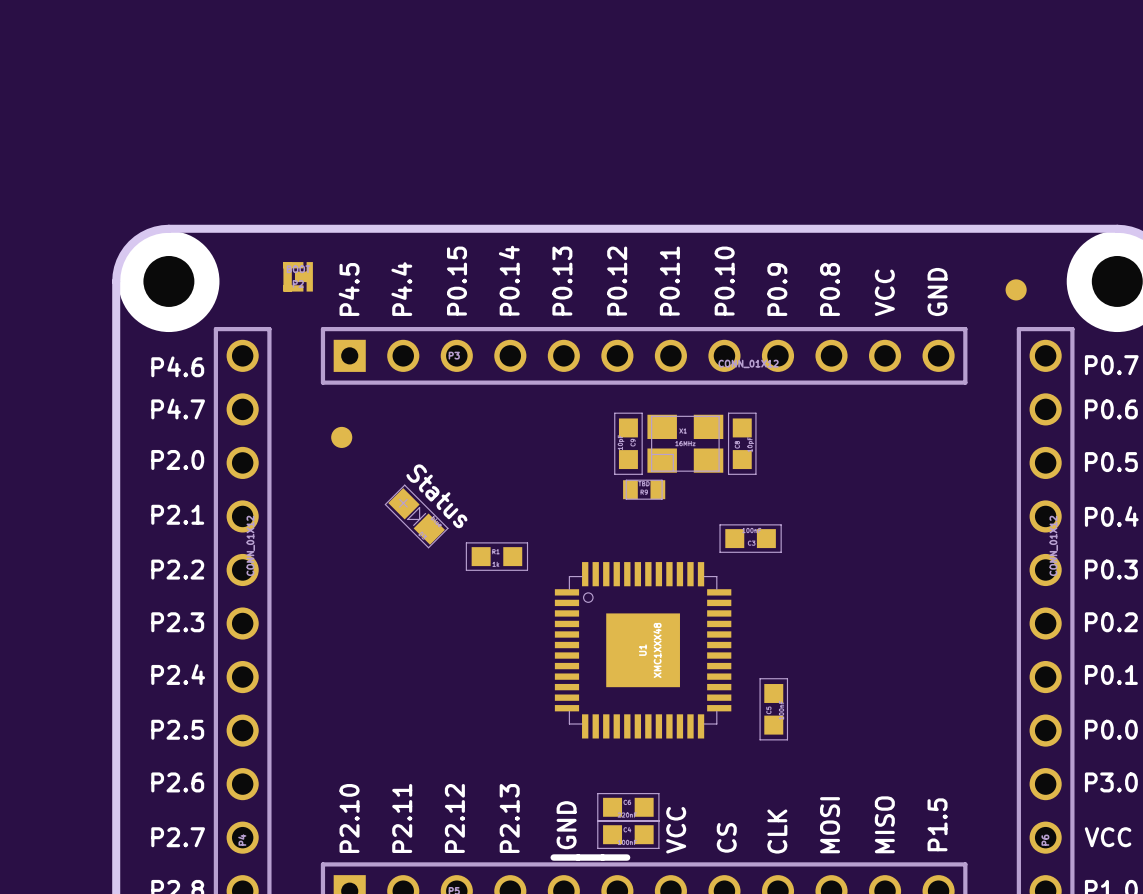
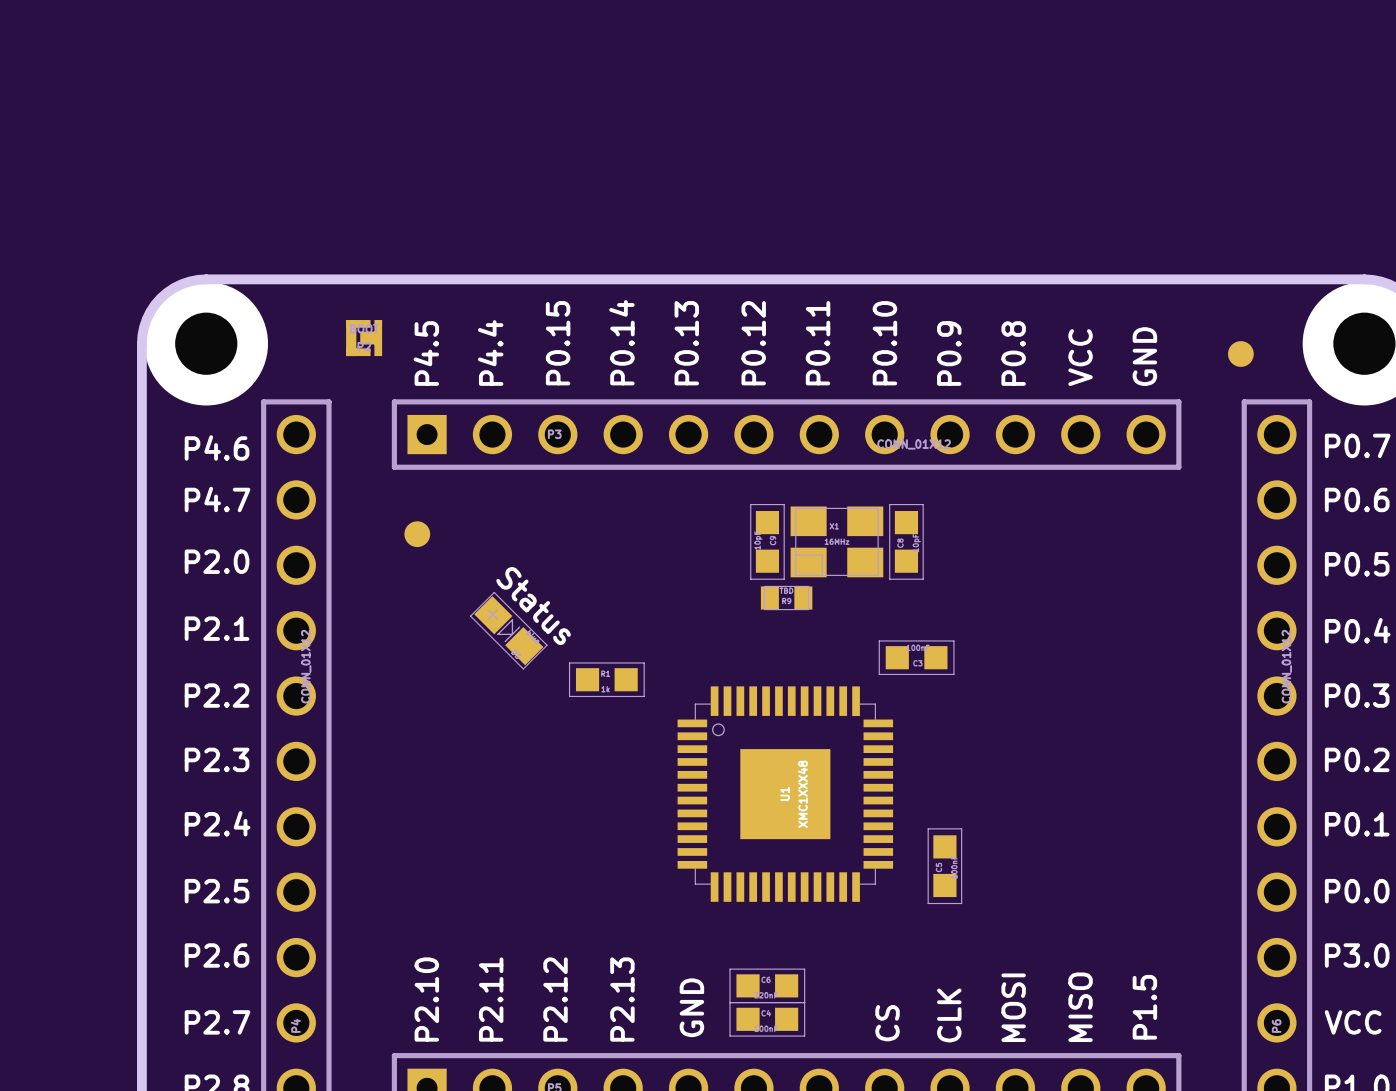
text: VCC (676, 830) -> none
text: ___ (590, 857) -> none

